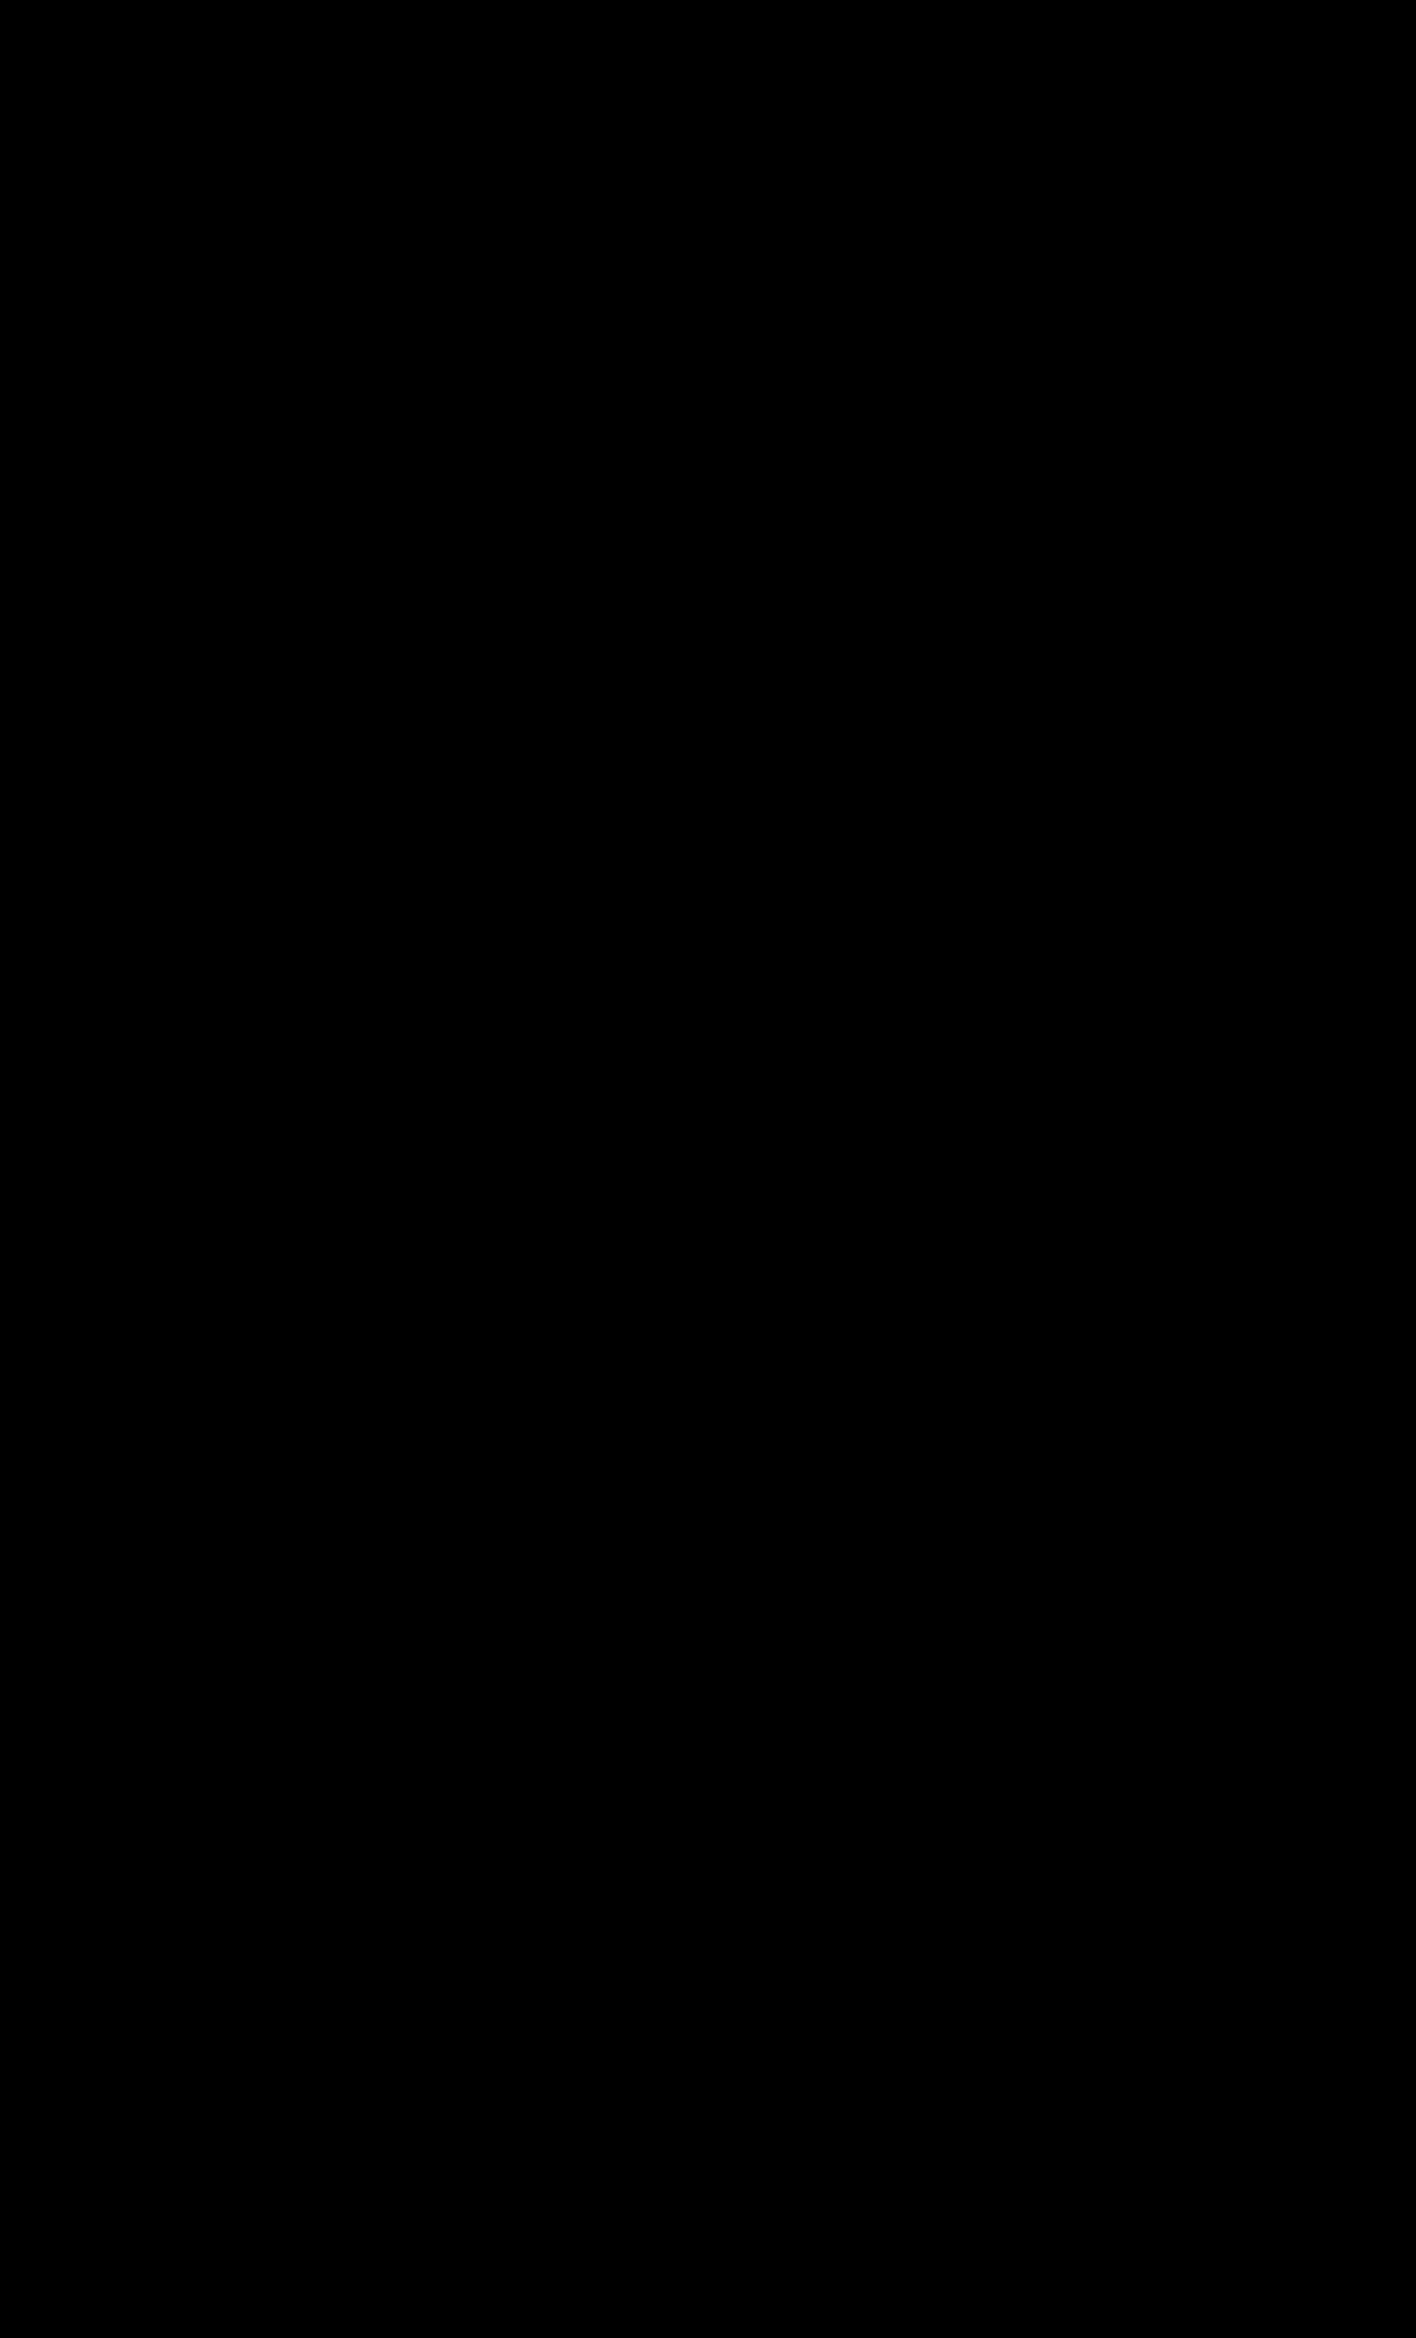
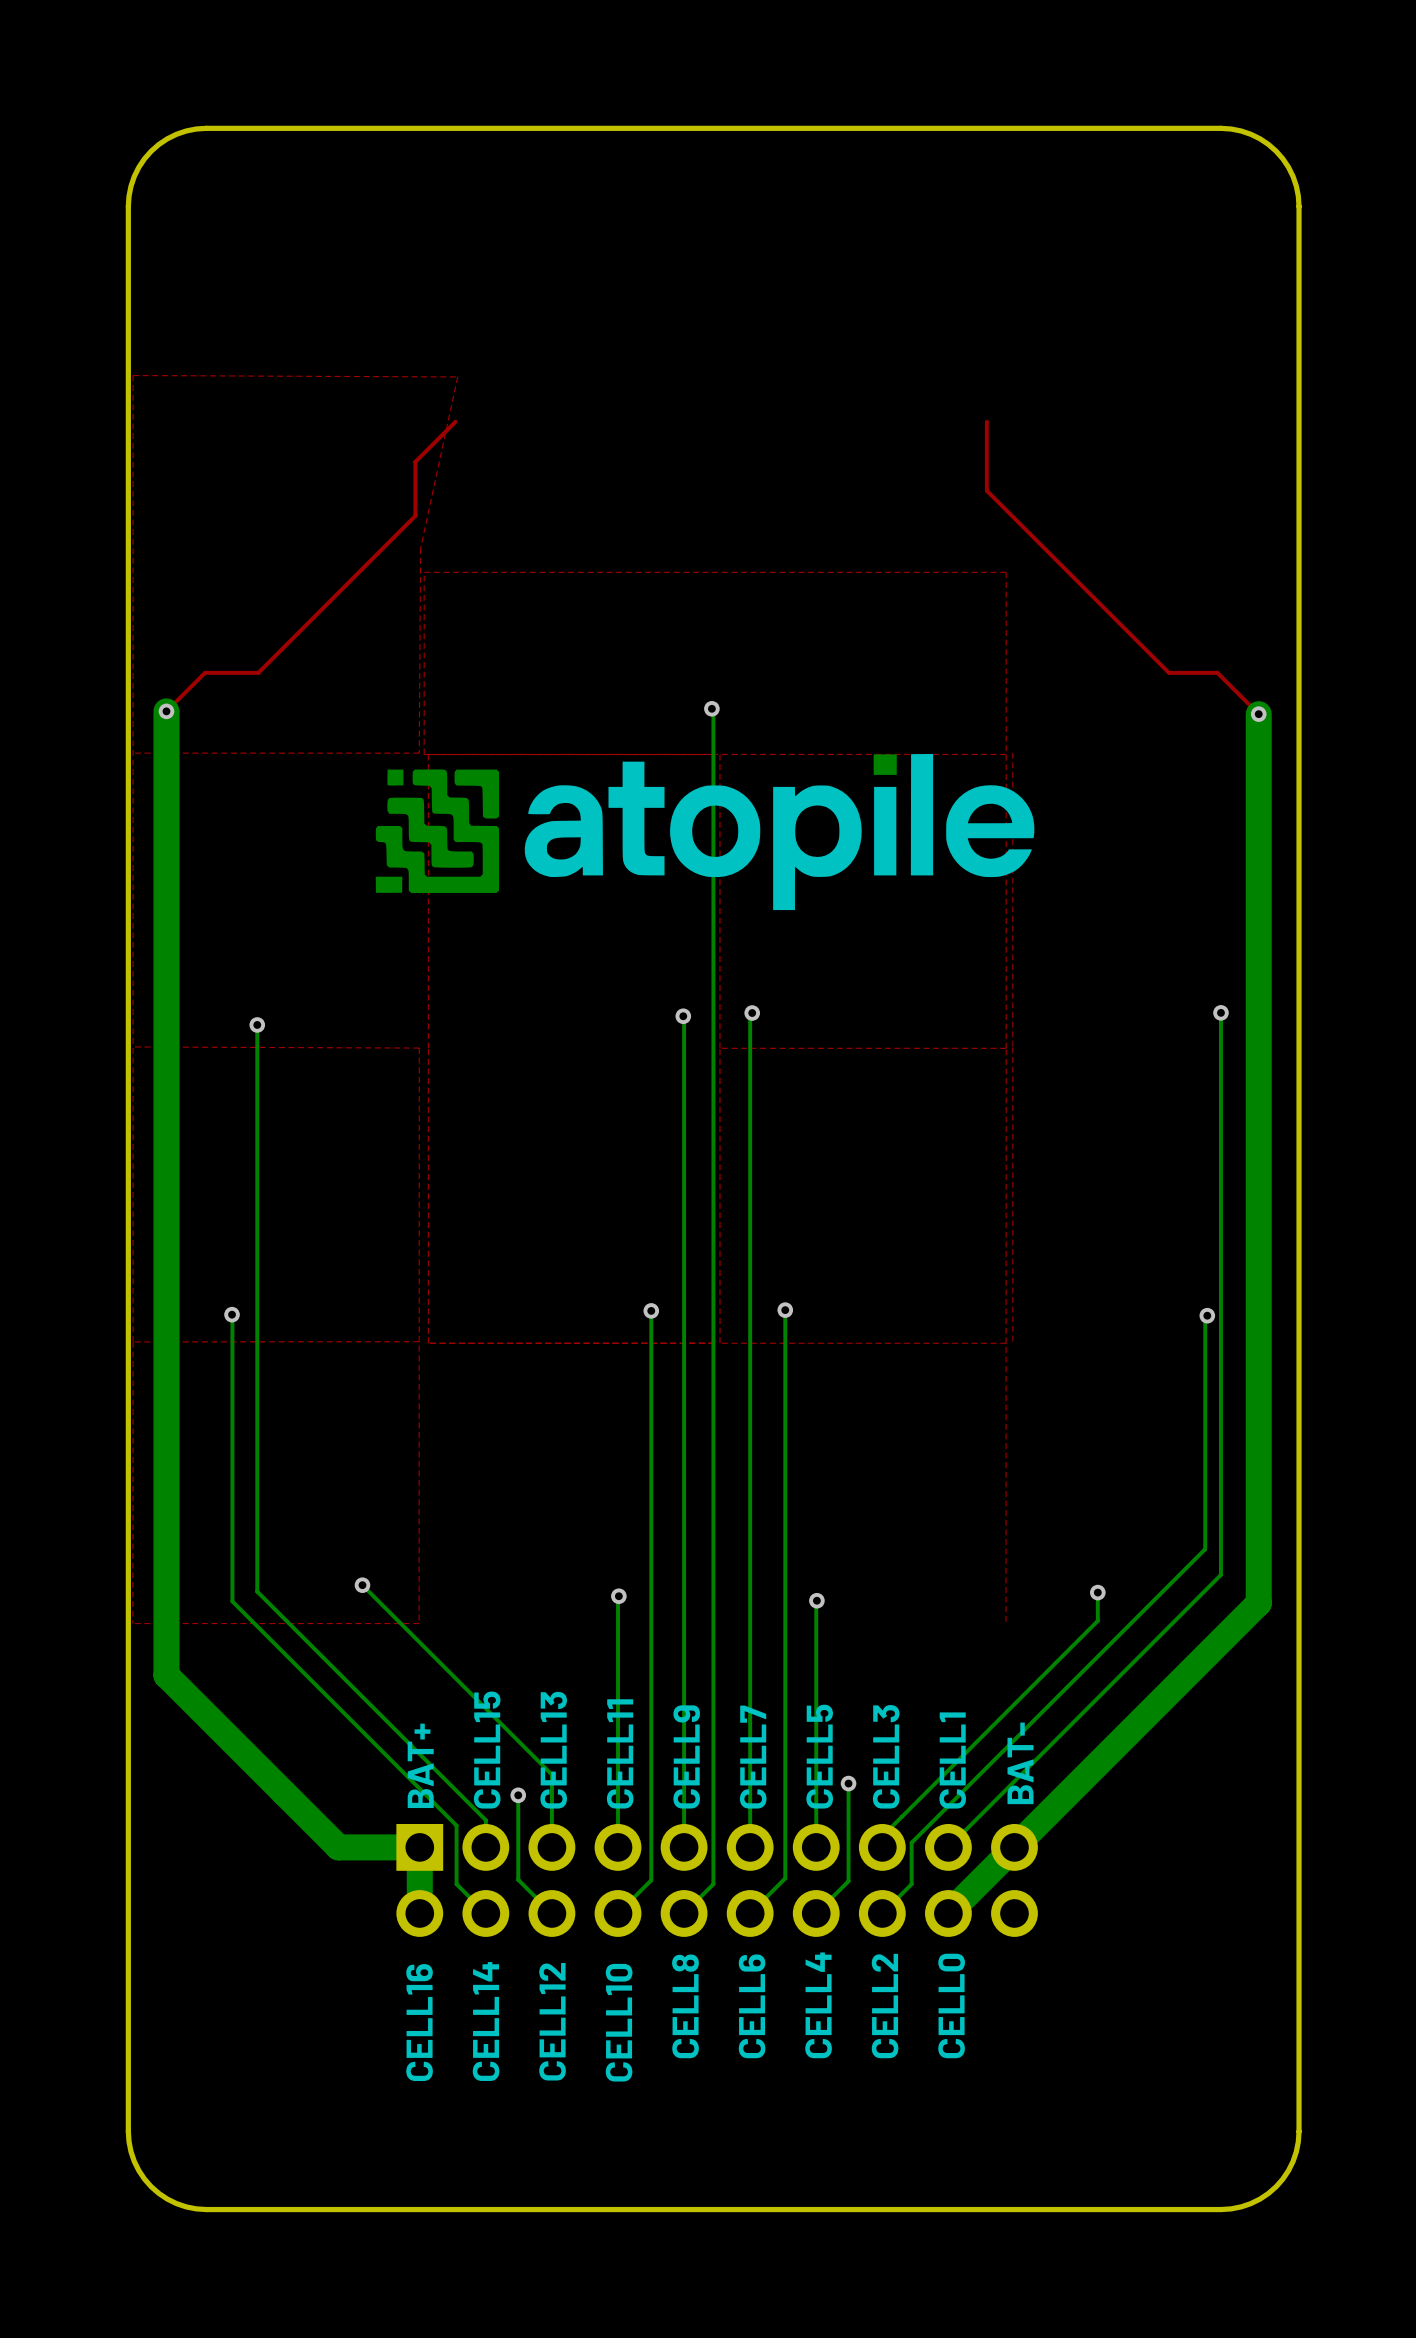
board edge: none -> (1220, 128) (206, 128) (186, 131) (167, 138) (151, 151) (138, 167) (131, 186) (128, 206) (128, 2131) (131, 2151) (138, 2170) (151, 2186) (167, 2199) (186, 2206) (206, 2209) (1220, 2209) (1241, 2206) (1260, 2199) (1276, 2186) (1288, 2170) (1296, 2151) (1299, 2131) (1299, 206) (1293, 176) (1276, 151) (1250, 134) (1220, 128)
top track: none -> (455, 421) (415, 461) (415, 515) (258, 672) (205, 672) (166, 711)
top track: none -> (986, 421) (986, 490) (1168, 672) (1217, 672) (1258, 714)
bottom track: none -> (711, 708) (713, 1884) (684, 1913)
via: none -> (711, 708)
bottom track: none -> (166, 711) (166, 1675) (338, 1847) (419, 1847) (419, 1913)
via: none -> (166, 711)
bottom track: none -> (1258, 714) (1258, 1603) (948, 1913)
via: none -> (1258, 714)
top zone outline: none -> (1012, 752) (1012, 1341)
top zone outline: none -> (133, 753) (419, 753) (420, 548) (457, 376) (133, 375) (133, 1046)
drawing: none -> [375, 753, 1035, 911]
top zone outline: none -> (428, 754) (428, 1343)
top zone outline: none -> (720, 754) (720, 1048)
top zone outline: none -> (1006, 754) (424, 754) (424, 572) (1006, 572) (1006, 1048) (720, 1048)
bottom track: none -> (1220, 1012) (1220, 1574) (948, 1847)
via: none -> (1220, 1012)
bottom track: none -> (752, 1013) (750, 1015) (750, 1847)
via: none -> (752, 1013)
bottom track: none -> (683, 1016) (684, 1847)
via: none -> (683, 1016)
bottom track: none -> (257, 1024) (257, 1591) (485, 1820) (485, 1847)
via: none -> (257, 1024)
top zone outline: none -> (133, 1046) (419, 1048) (419, 1623) (132, 1623) (133, 1341)
top zone outline: none -> (133, 1046) (133, 1341)
top zone outline: none -> (720, 1048) (720, 1343) (1006, 1343)
top zone outline: none -> (1006, 1049) (1006, 1624)
bottom track: none -> (651, 1310) (651, 1880) (618, 1913)
via: none -> (651, 1310)
bottom track: none -> (785, 1310) (785, 1878) (750, 1913)
via: none -> (785, 1310)
bottom track: none -> (232, 1314) (232, 1601) (456, 1825) (456, 1884) (485, 1913)
via: none -> (232, 1314)
bottom track: none -> (1207, 1315) (1205, 1317) (1205, 1549) (911, 1842) (911, 1884) (882, 1913)
via: none -> (1207, 1315)
top zone outline: none -> (419, 1341) (133, 1341)
top zone outline: none -> (428, 1343) (714, 1343) (428, 1343)
bottom track: none -> (362, 1585) (551, 1774) (551, 1847)
via: none -> (362, 1585)
bottom track: none -> (1097, 1592) (1097, 1620) (882, 1836) (882, 1847)
via: none -> (1097, 1592)
bottom track: none -> (618, 1596) (618, 1847)
via: none -> (618, 1596)
bottom track: none -> (816, 1600) (816, 1847)
via: none -> (816, 1600)
text: none -> CELL15 (487, 1750)
text: none -> CELL13 (553, 1750)
text: none -> CELL11 (620, 1753)
text: none -> CELL9 (686, 1756)
text: none -> CELL5 (819, 1756)
text: none -> CELL3 (886, 1756)
text: none -> CELL7 (753, 1757)
text: none -> CELL1 (952, 1760)
text: none -> BAT- (1020, 1763)
text: none -> BAT+ (420, 1765)
bottom track: none -> (848, 1783) (848, 1881) (816, 1913)
via: none -> (848, 1783)
bottom track: none -> (518, 1795) (518, 1879) (551, 1913)
via: none -> (518, 1795)
part: none -> (717, 1880)
text: none -> CELL4 (818, 2005)
text: none -> CELL0 (951, 2005)
text: none -> CELL8 (685, 2006)
text: none -> CELL6 (752, 2006)
text: none -> CELL2 (885, 2006)
text: none -> CELL14 (486, 2021)
text: none -> CELL12 (552, 2021)
text: none -> CELL16 (419, 2022)
text: none -> CELL10 (619, 2022)

